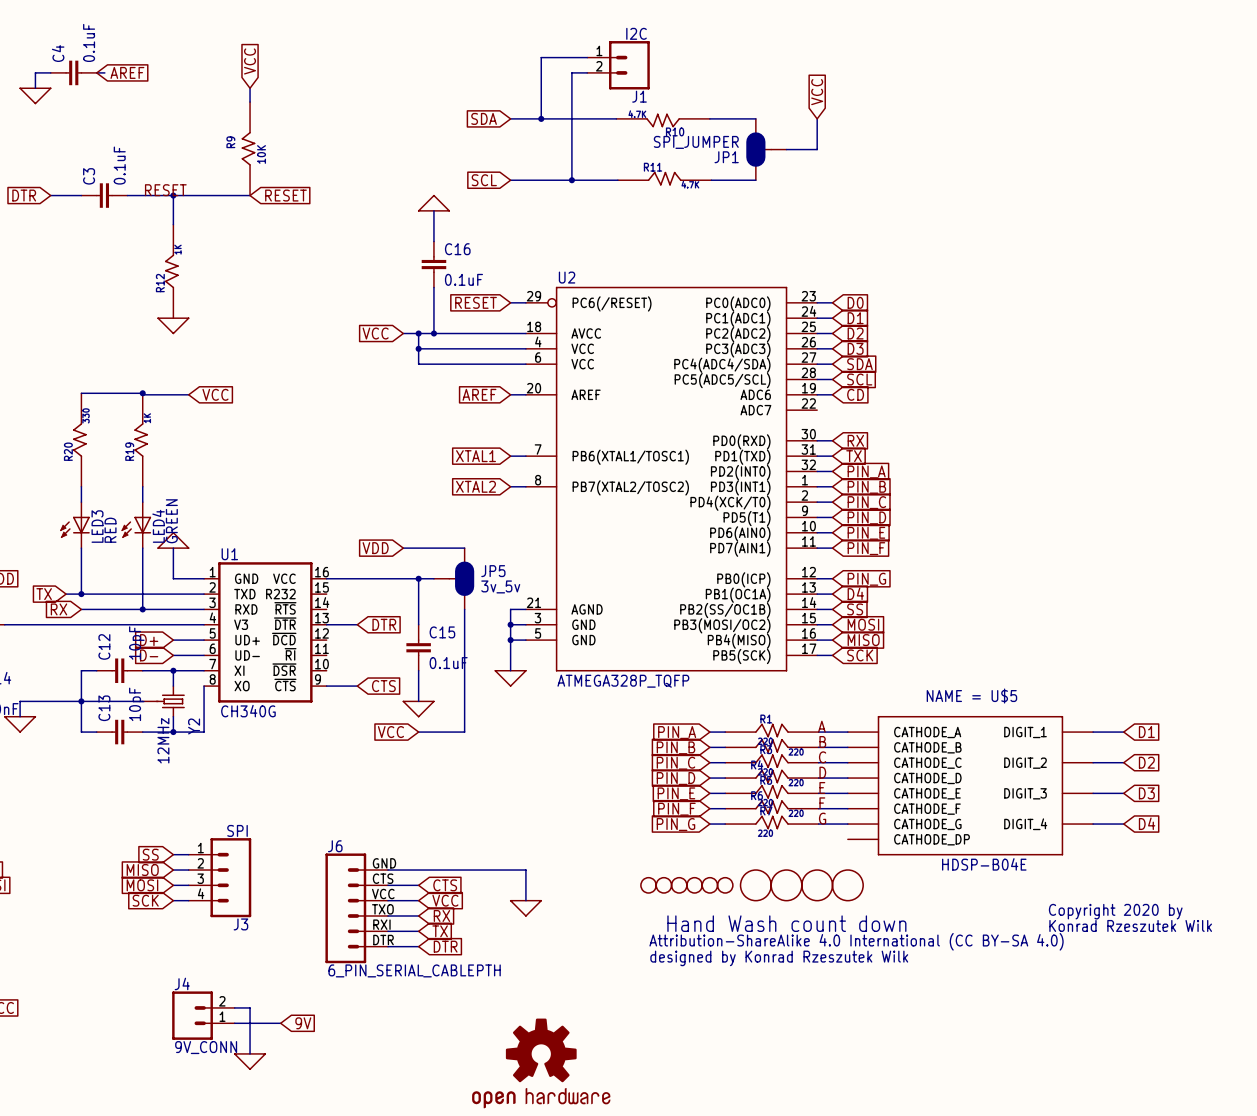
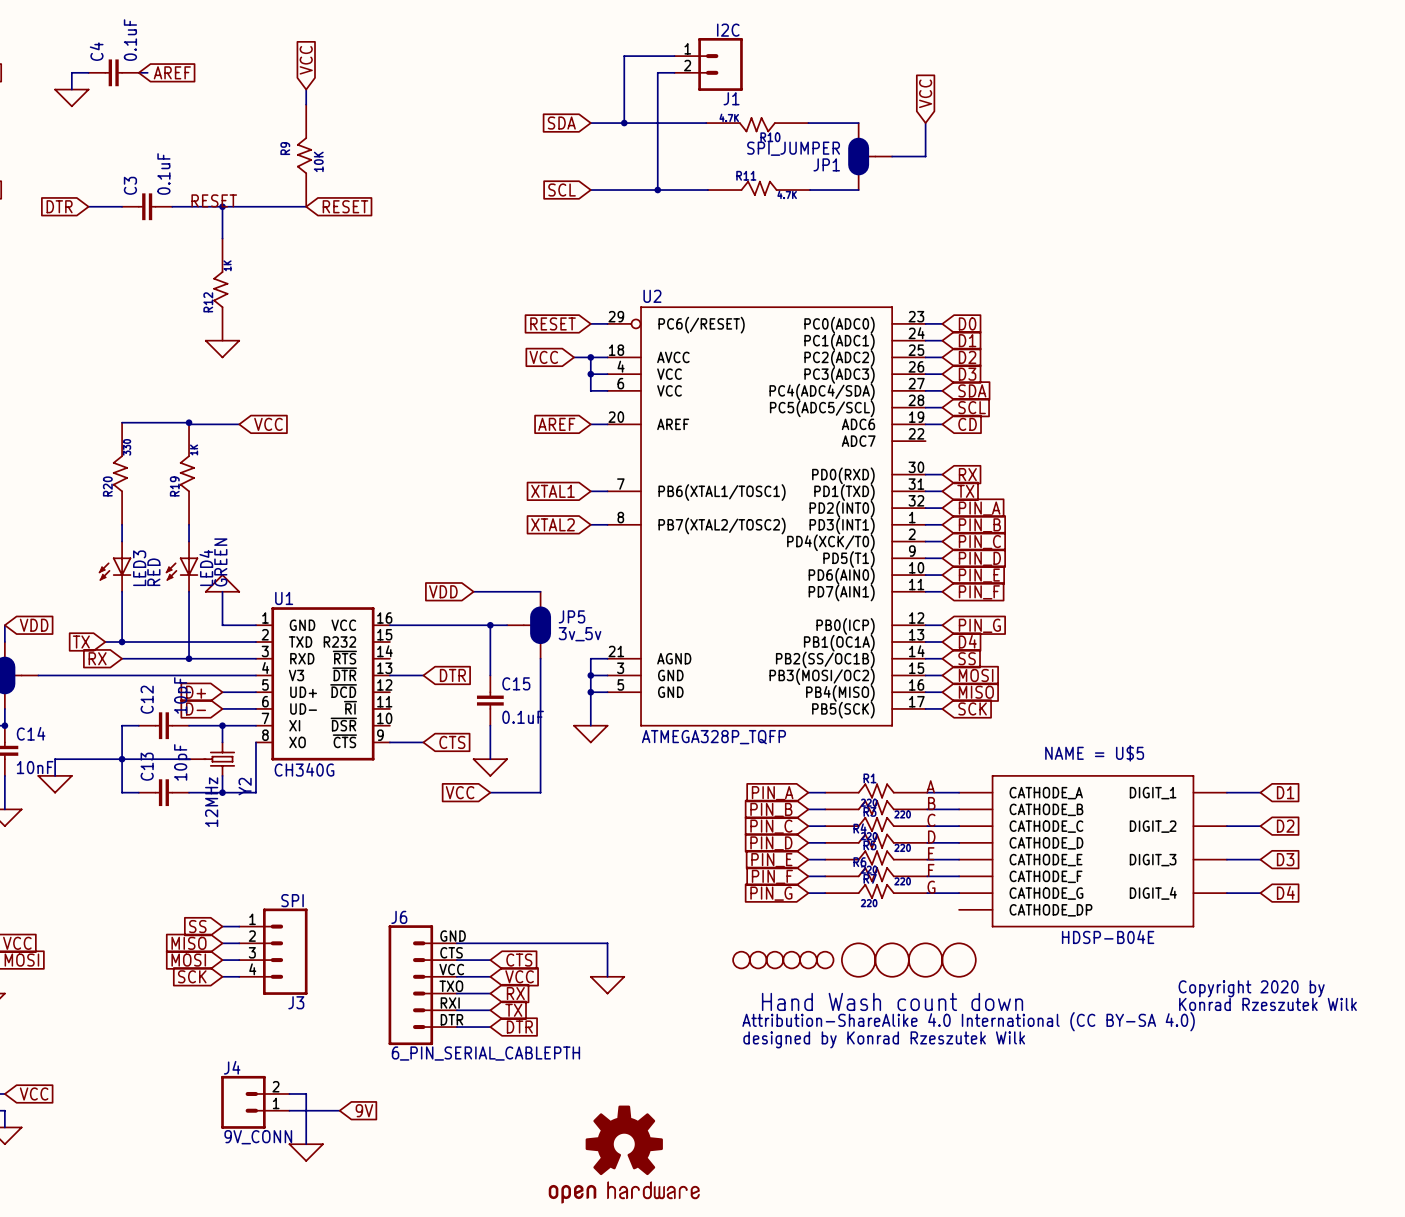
power symbol: (433, 203) -> none
wire: (433, 210) (433, 241) -> none
C16: 0.1uF (433, 264) -> none
wire: (433, 287) (433, 333) -> none
global label position: VCC (375, 333) -> VCC (543, 357)
wire: (403, 333) (495, 333) -> none
wire: (418, 333) (418, 364) (510, 364) -> (590, 357) (590, 390)
junction: (418, 333) -> none
junction: (433, 333) -> none
junction: none -> (590, 357)
wire: (418, 348) (510, 348) -> none
junction: (418, 348) -> none
junction: none -> (590, 374)

